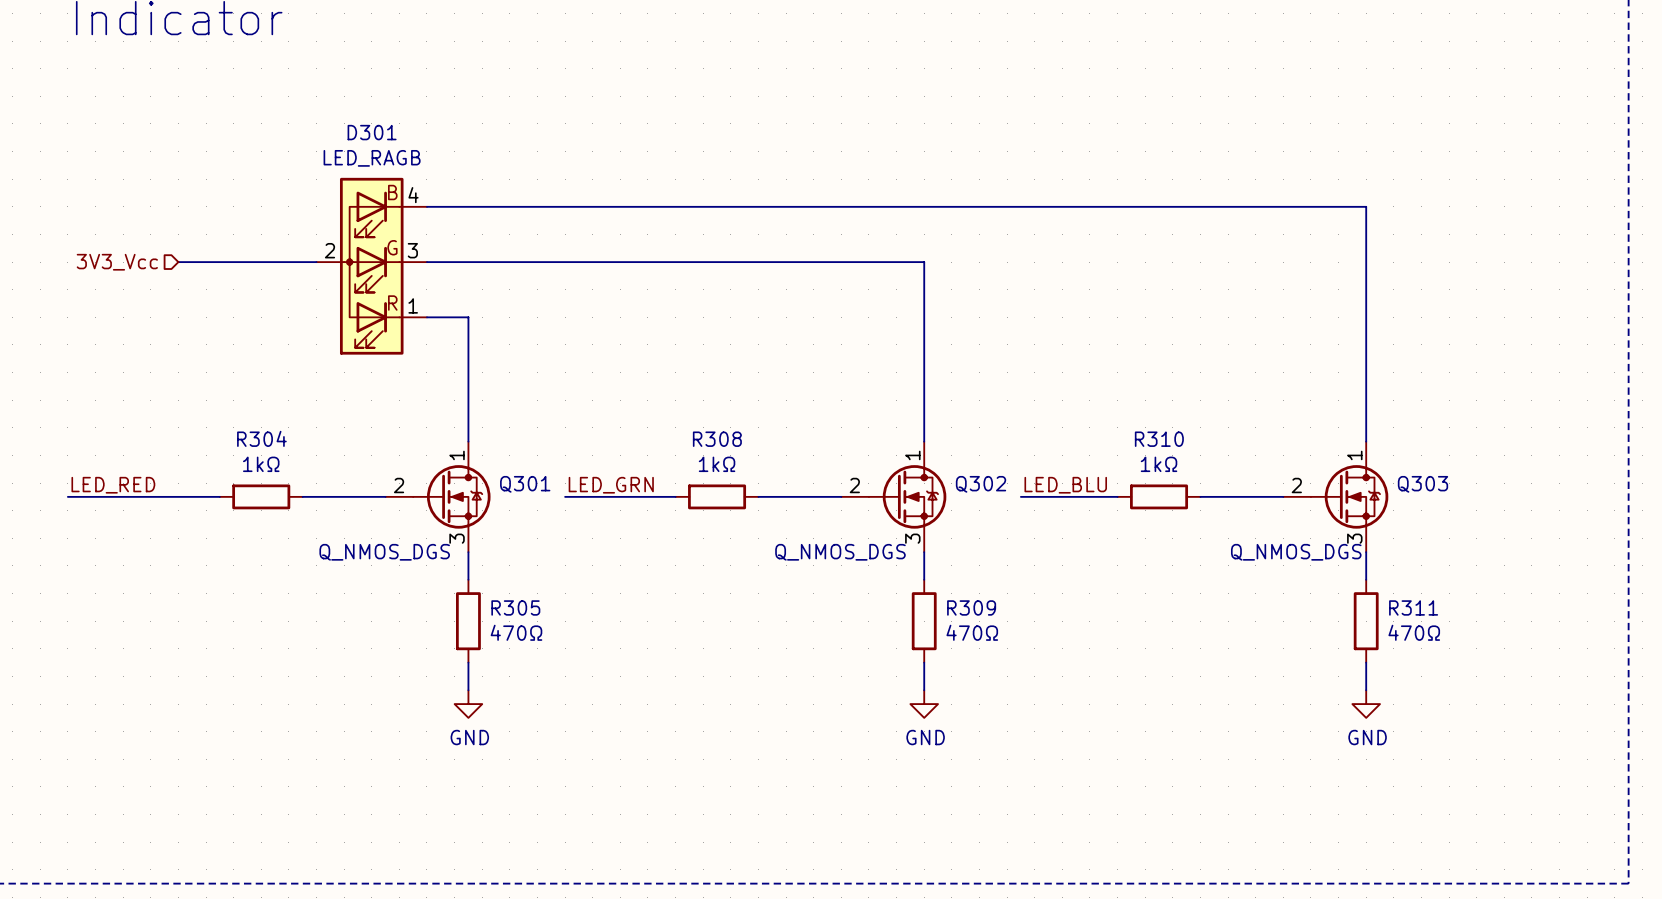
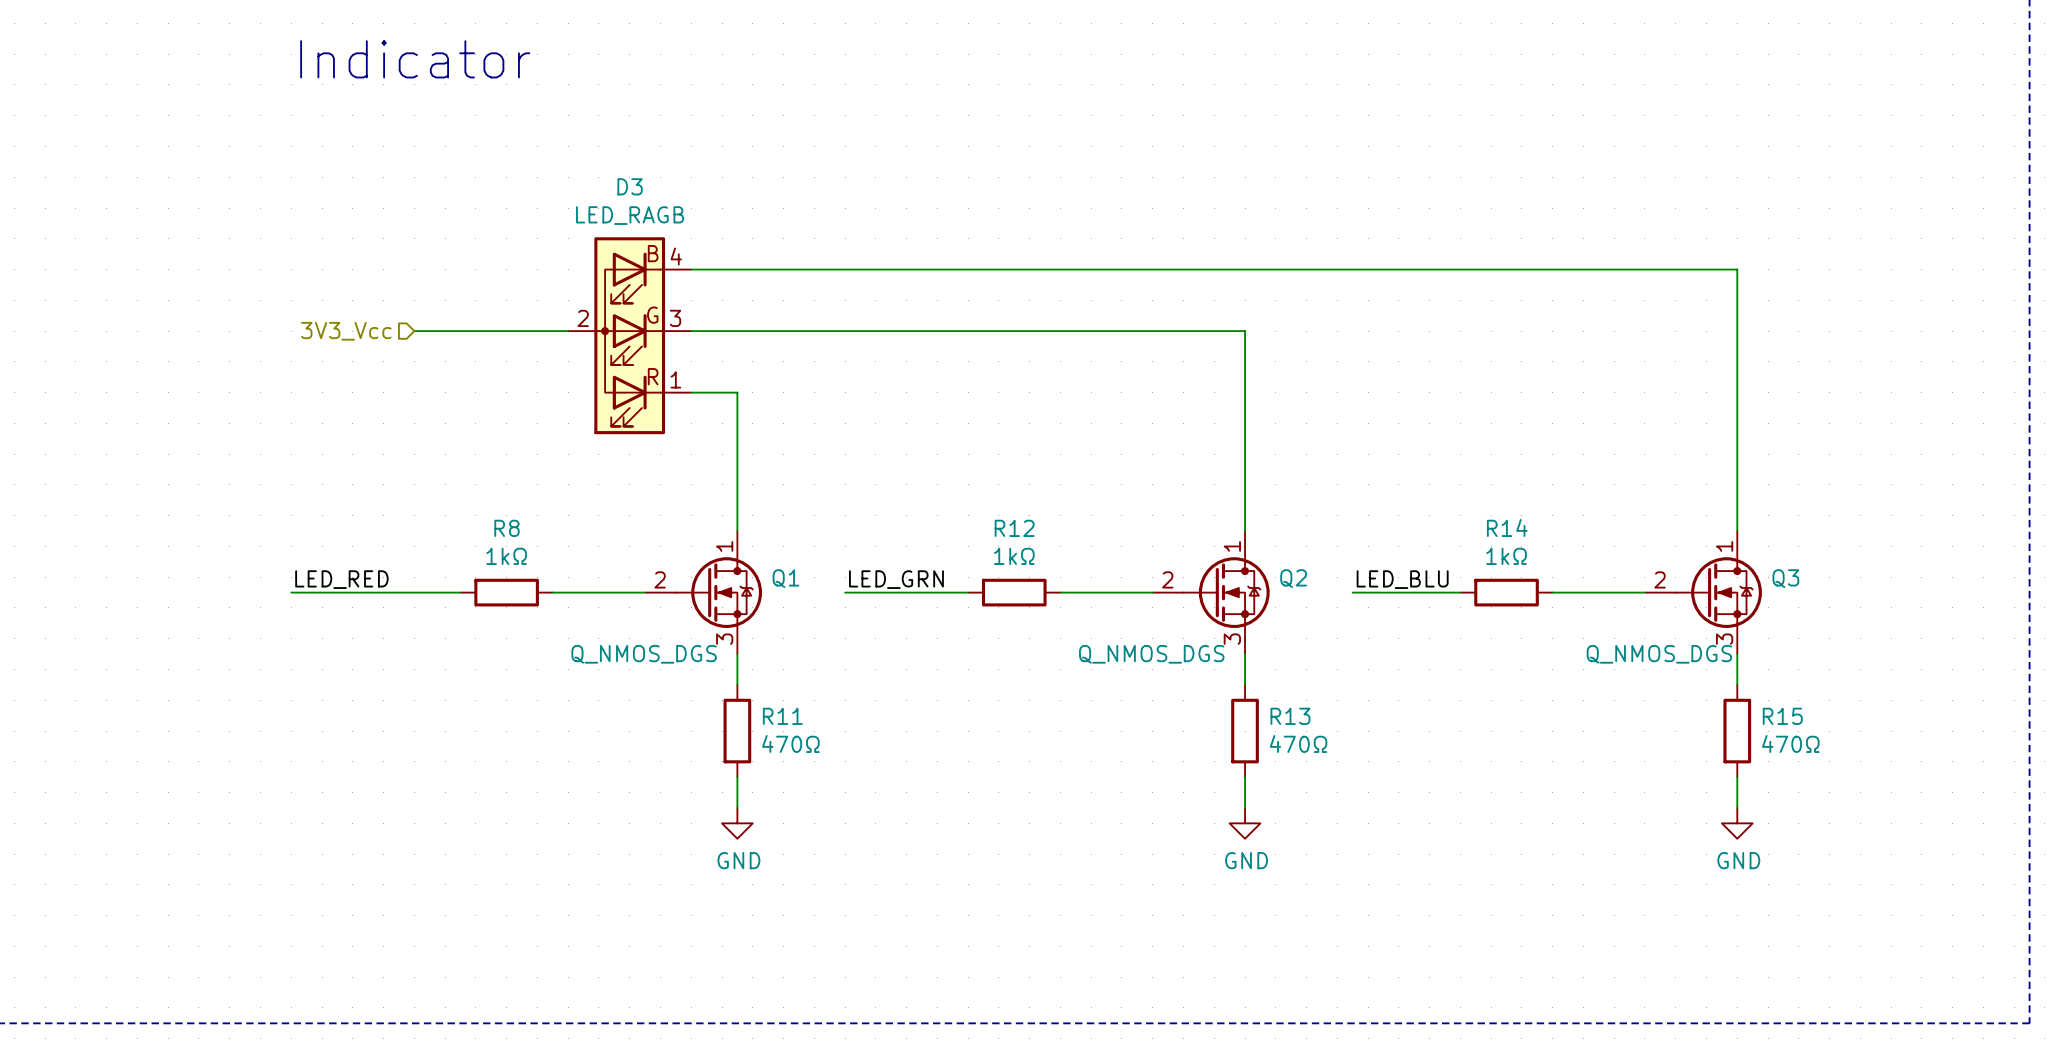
D301 name: D301 (372, 132) -> D3 (630, 186)
R304 name: R304 (261, 438) -> R8 (507, 528)
R308 name: R308 (717, 439) -> R12 (1014, 528)
R310 name: R310 (1159, 439) -> R14 (1507, 527)
Q301 name: Q301 (525, 484) -> Q1 (785, 578)
Q302 name: Q302 (981, 484) -> Q2 (1293, 578)
Q303 name: Q303 (1422, 484) -> Q3 (1785, 578)
R305 name: R305 (515, 607) -> R11 (782, 716)
R309 name: R309 (971, 607) -> R13 (1290, 716)
R311 name: R311 (1413, 607) -> R15 (1782, 716)

